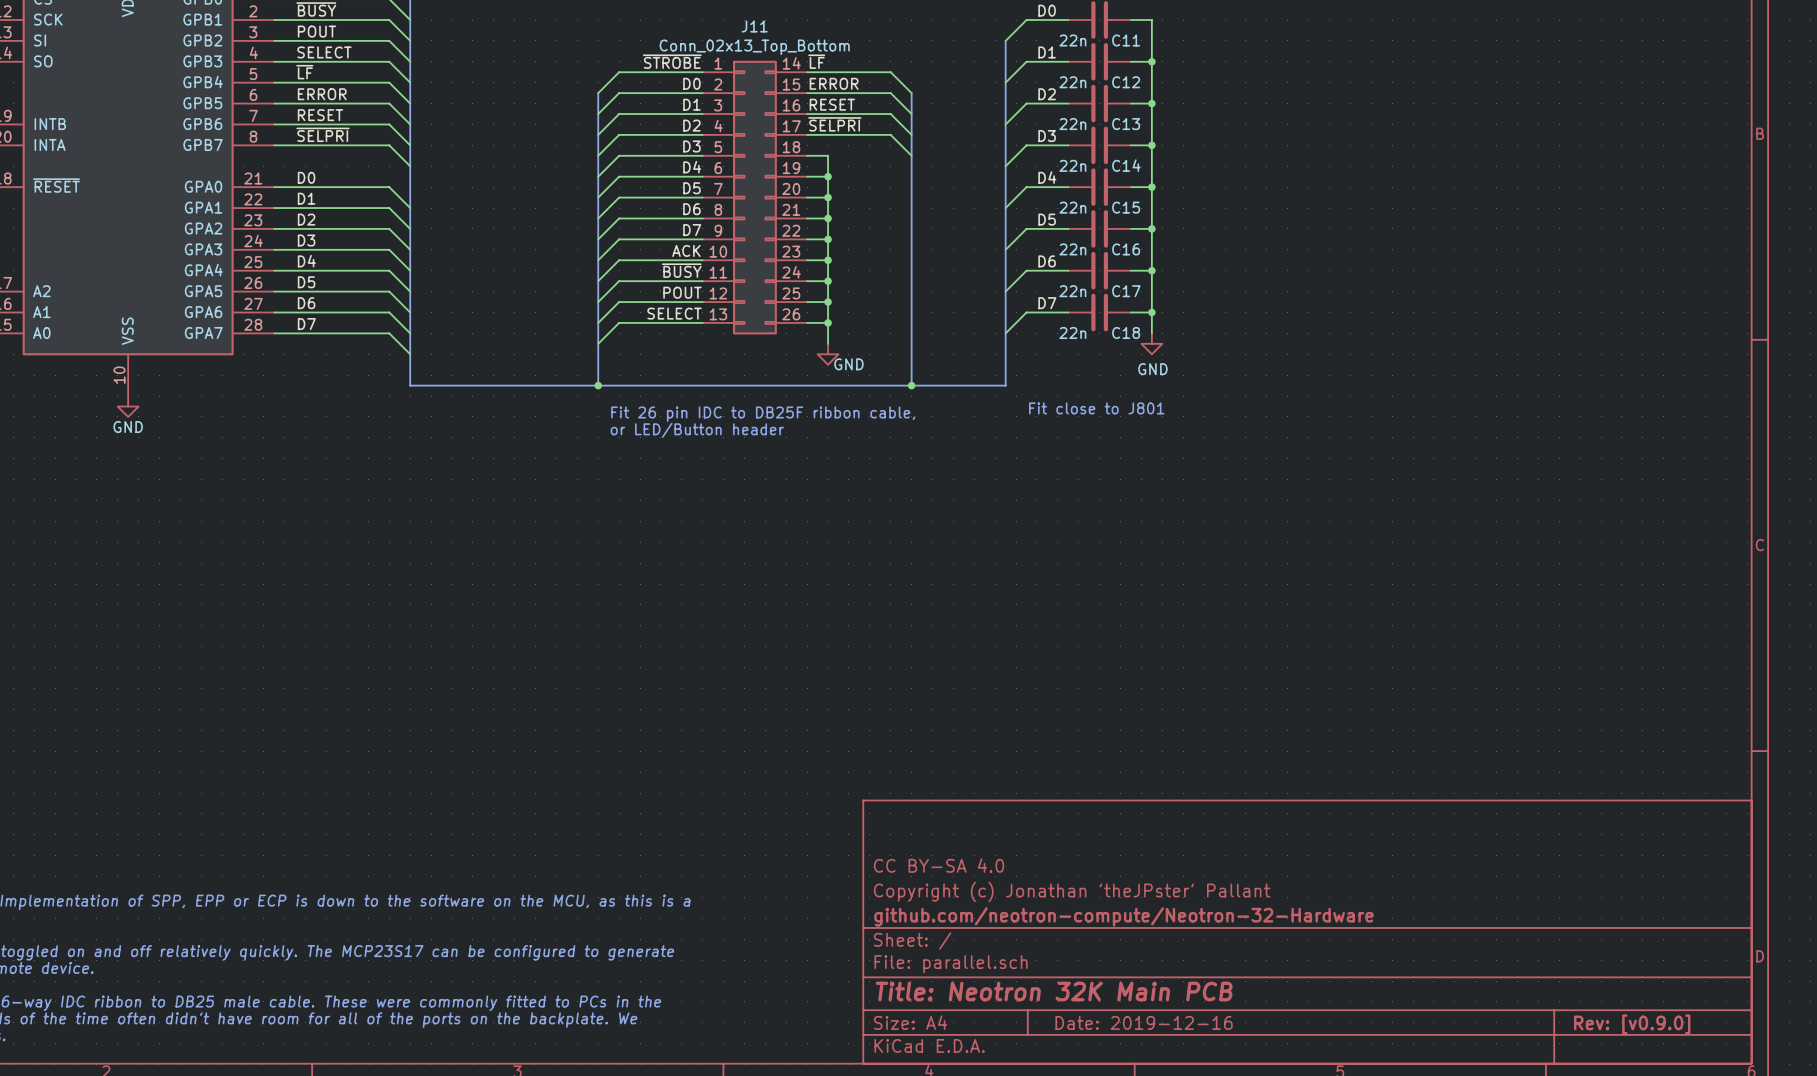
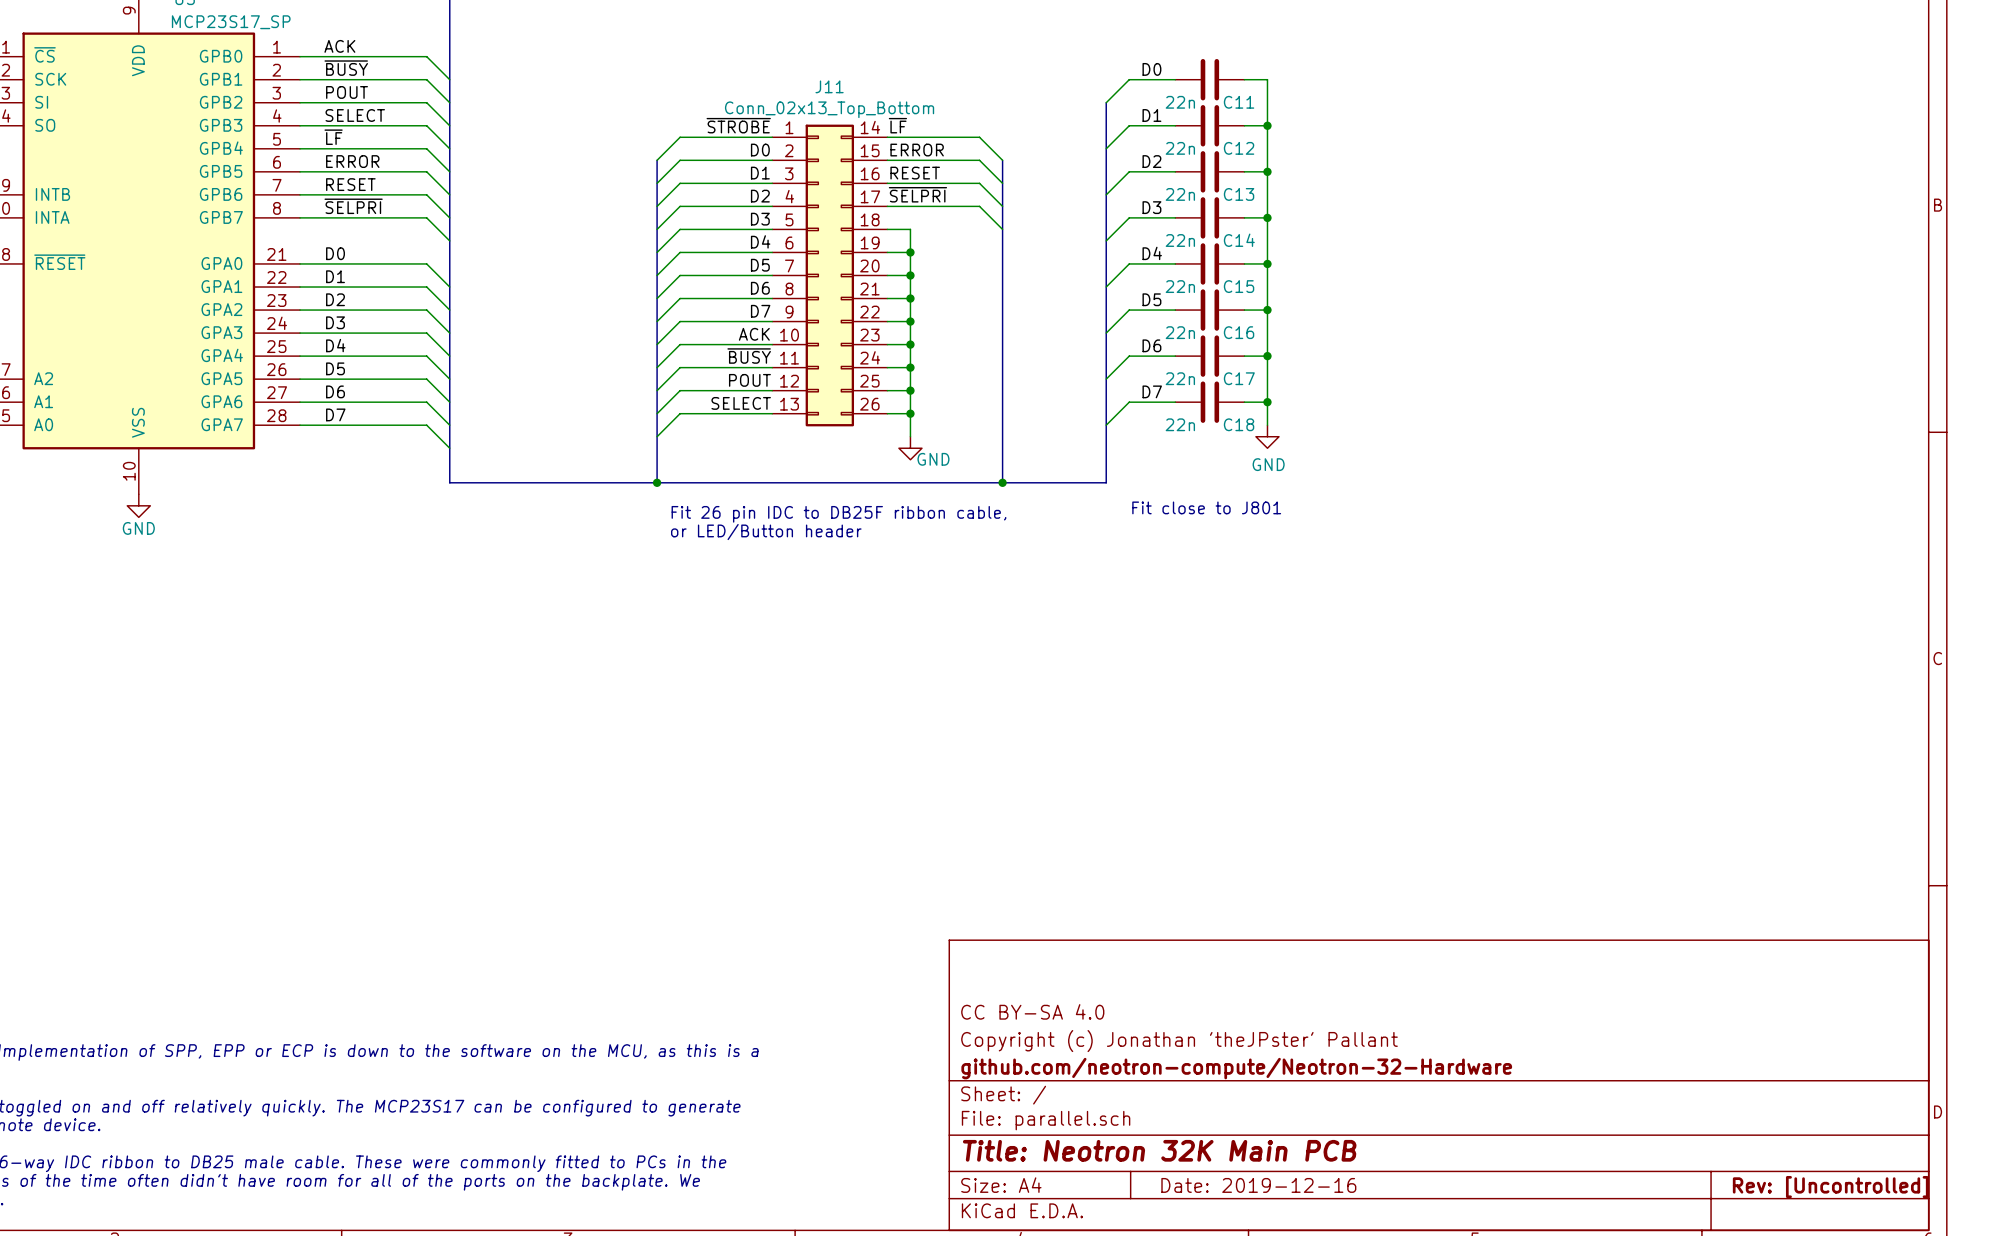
title block: Rev: [v0.9.0] (1632, 1024) -> Rev: [Uncontrolled] (1830, 1187)

